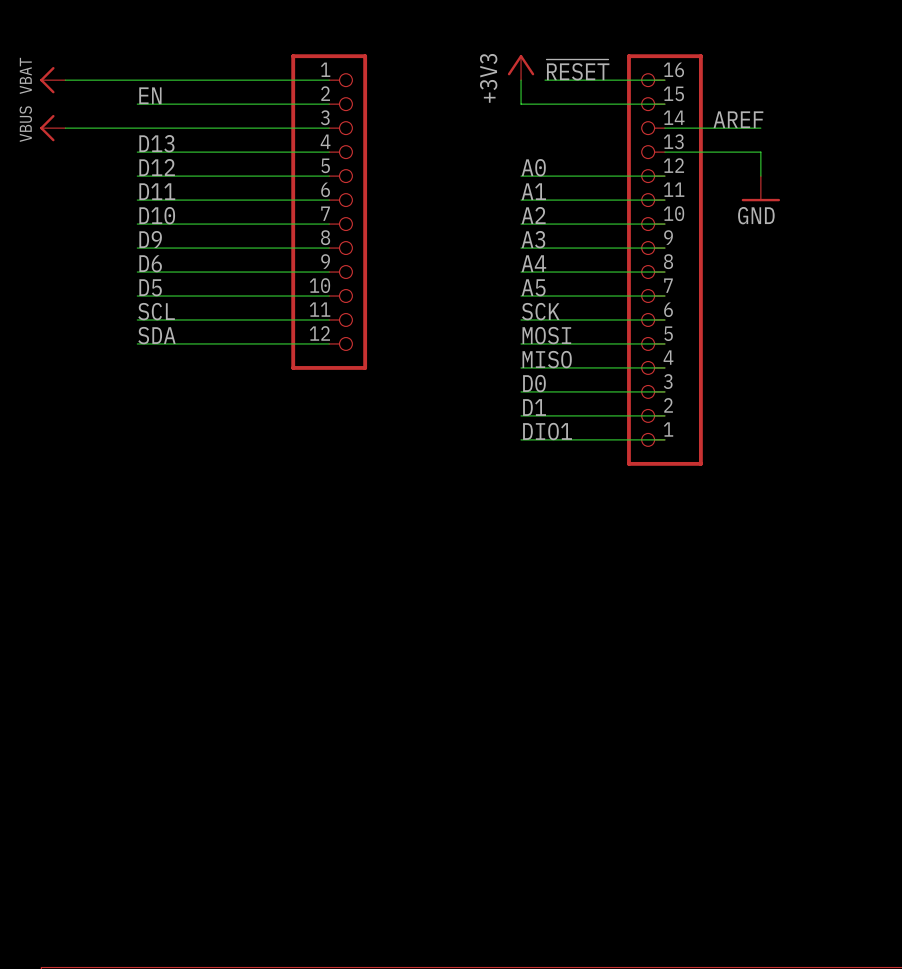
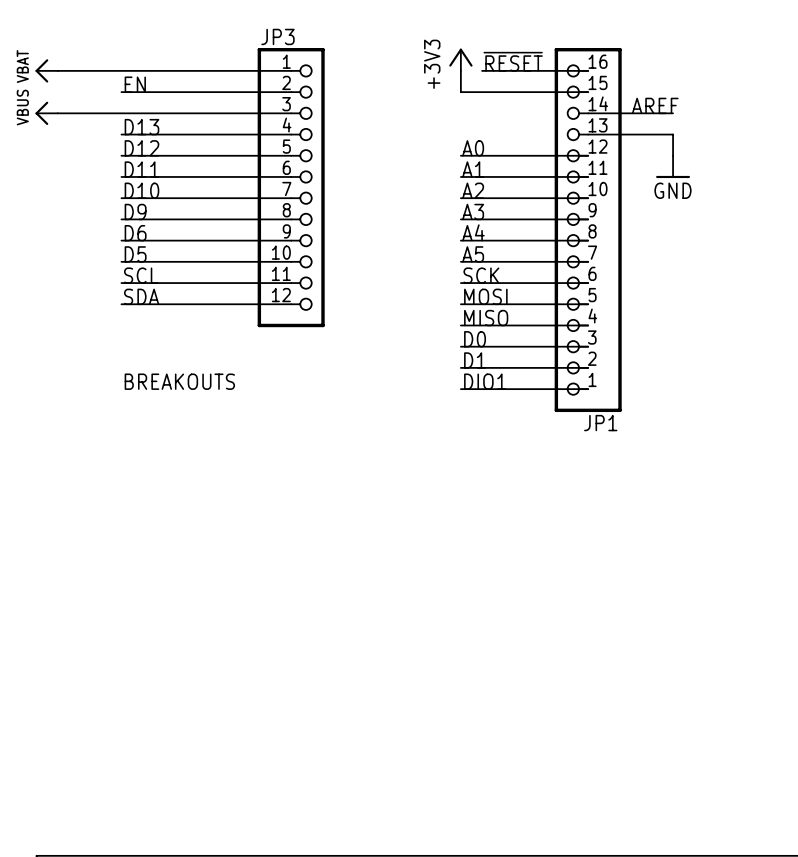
JP3 name: none -> JP3 (277, 36)
text: none -> BREAKOUTS (179, 381)
JP1 name: none -> JP1 (600, 423)

